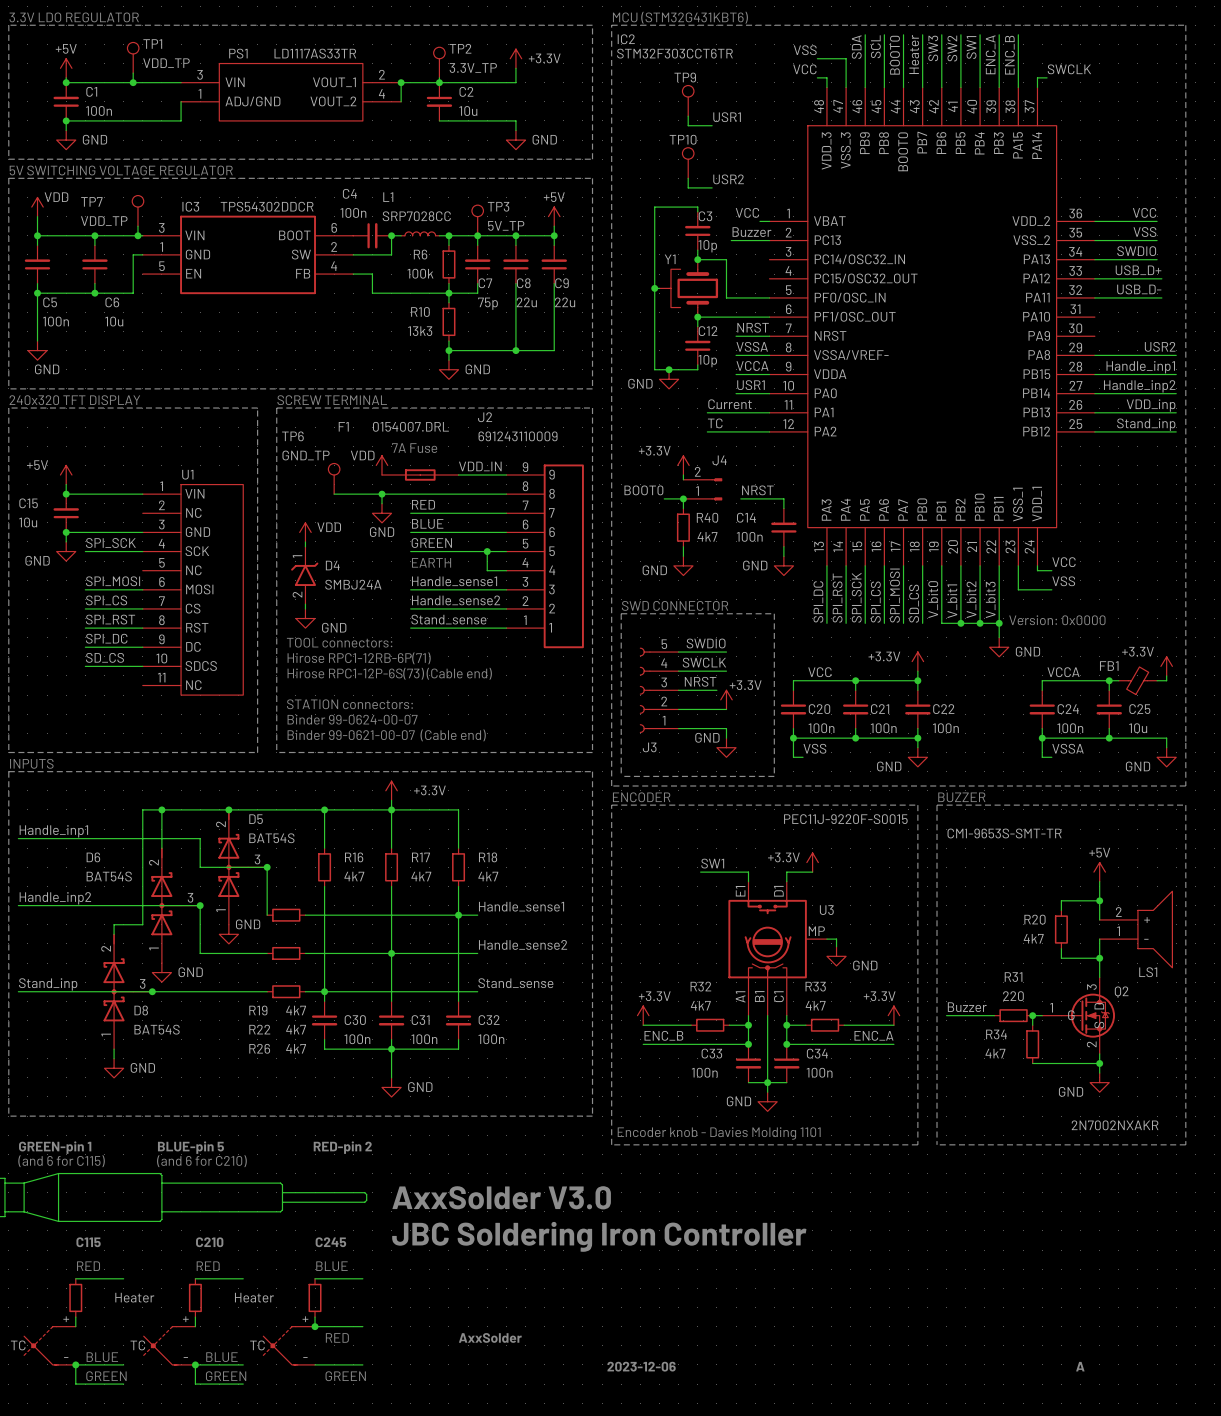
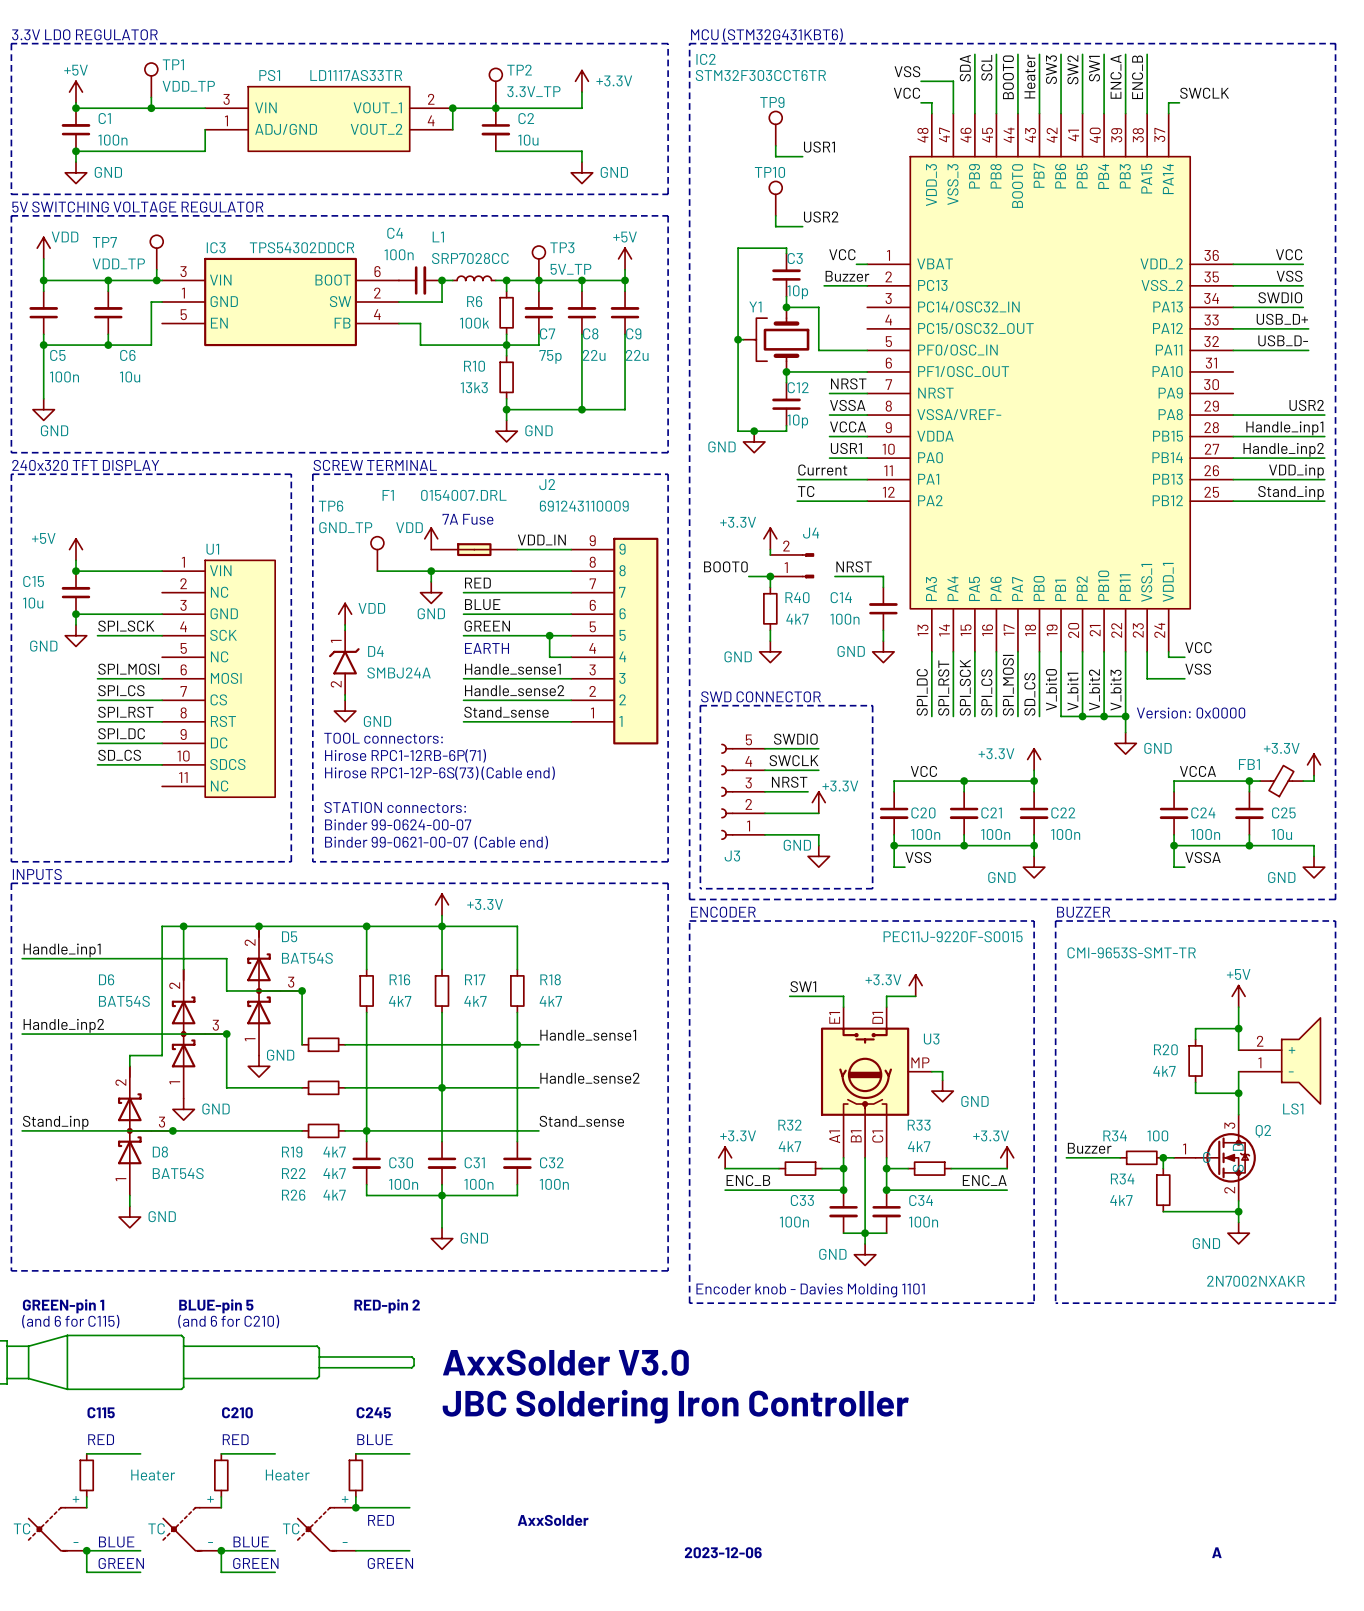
R31 name: R31 (1013, 977) -> R34 (1115, 1135)
R31 value: 220 (1013, 996) -> 100 (1157, 1135)

